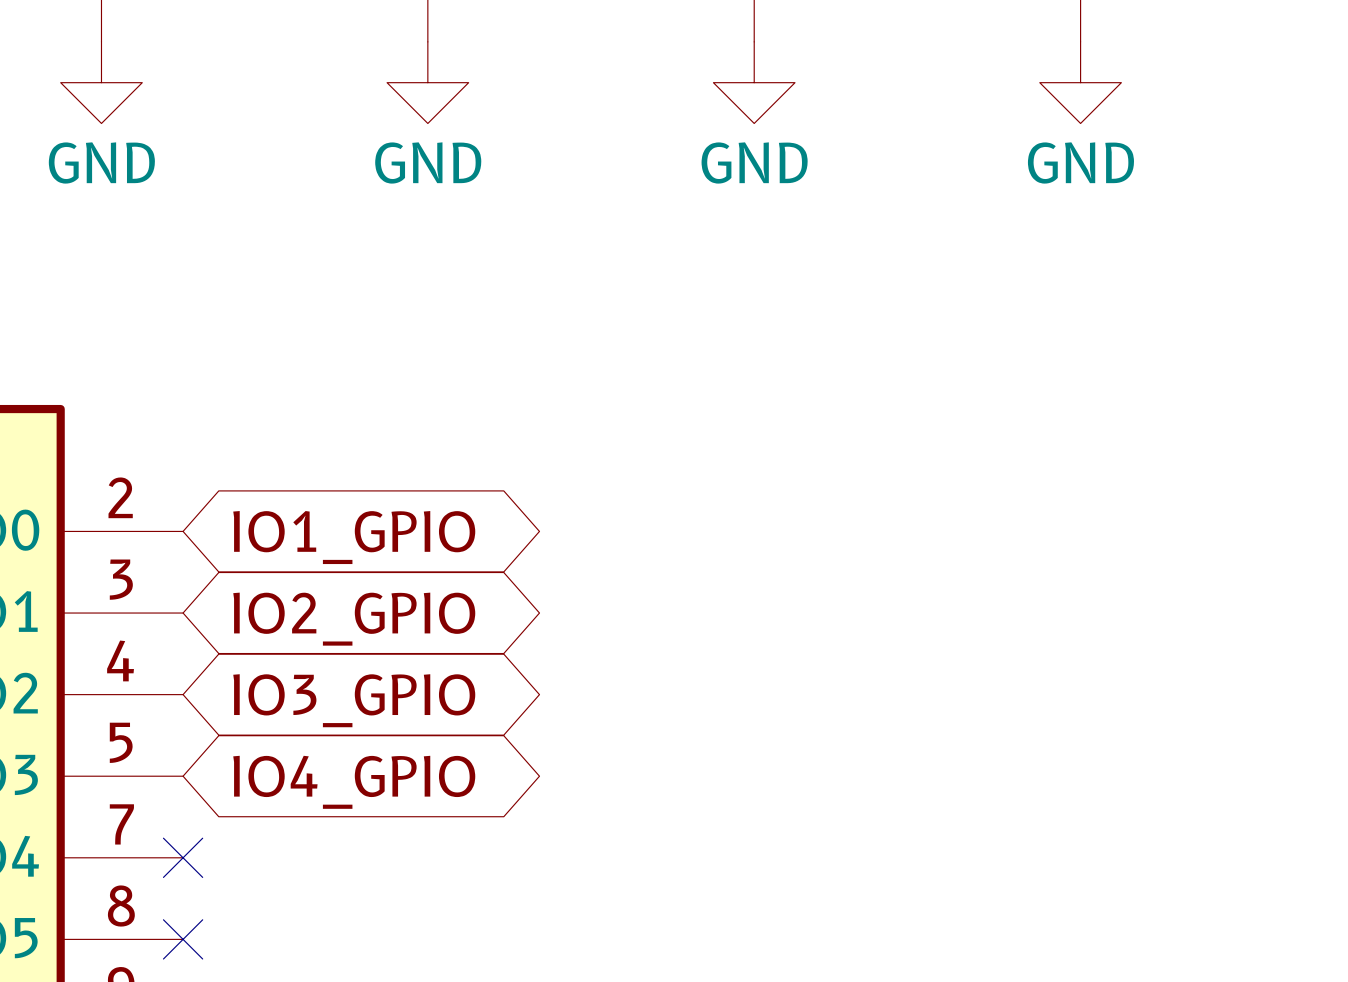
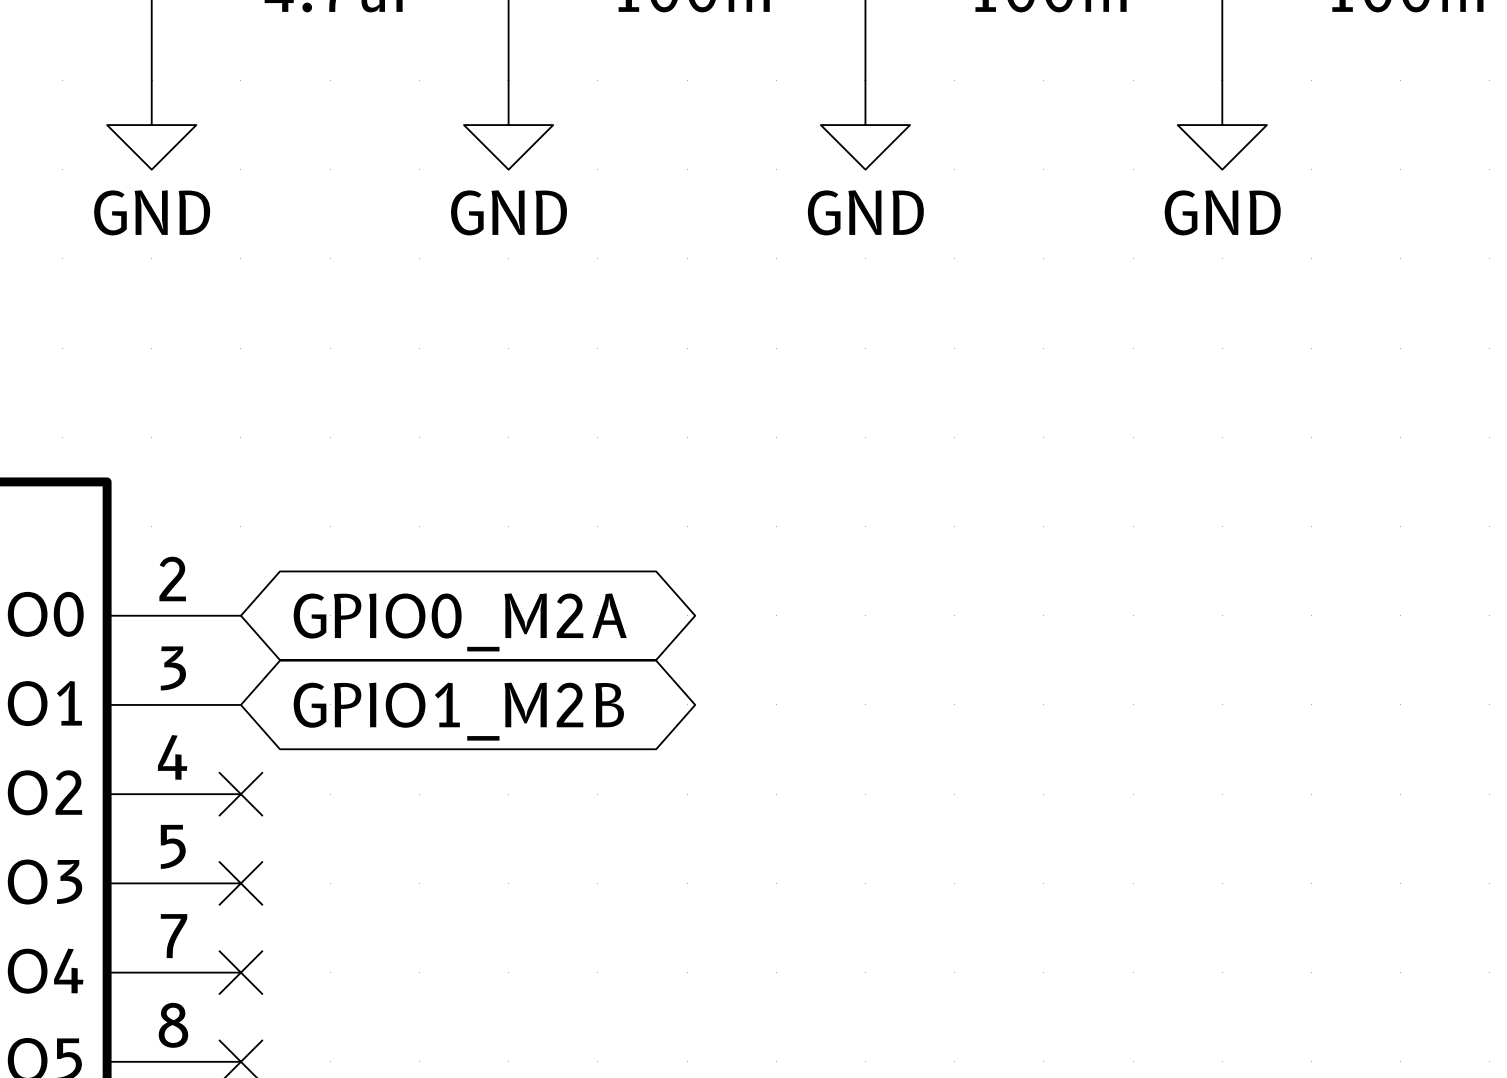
global label: IO1_GPIO (354, 537) -> GPIO0_M2A (460, 622)
global label: IO2_GPIO (354, 619) -> GPIO1_M2B (458, 711)
no-connect mark: none -> (240, 794)
global label: IO3_GPIO (354, 700) -> none
no-connect mark: none -> (240, 883)
global label: IO4_GPIO (354, 782) -> none

